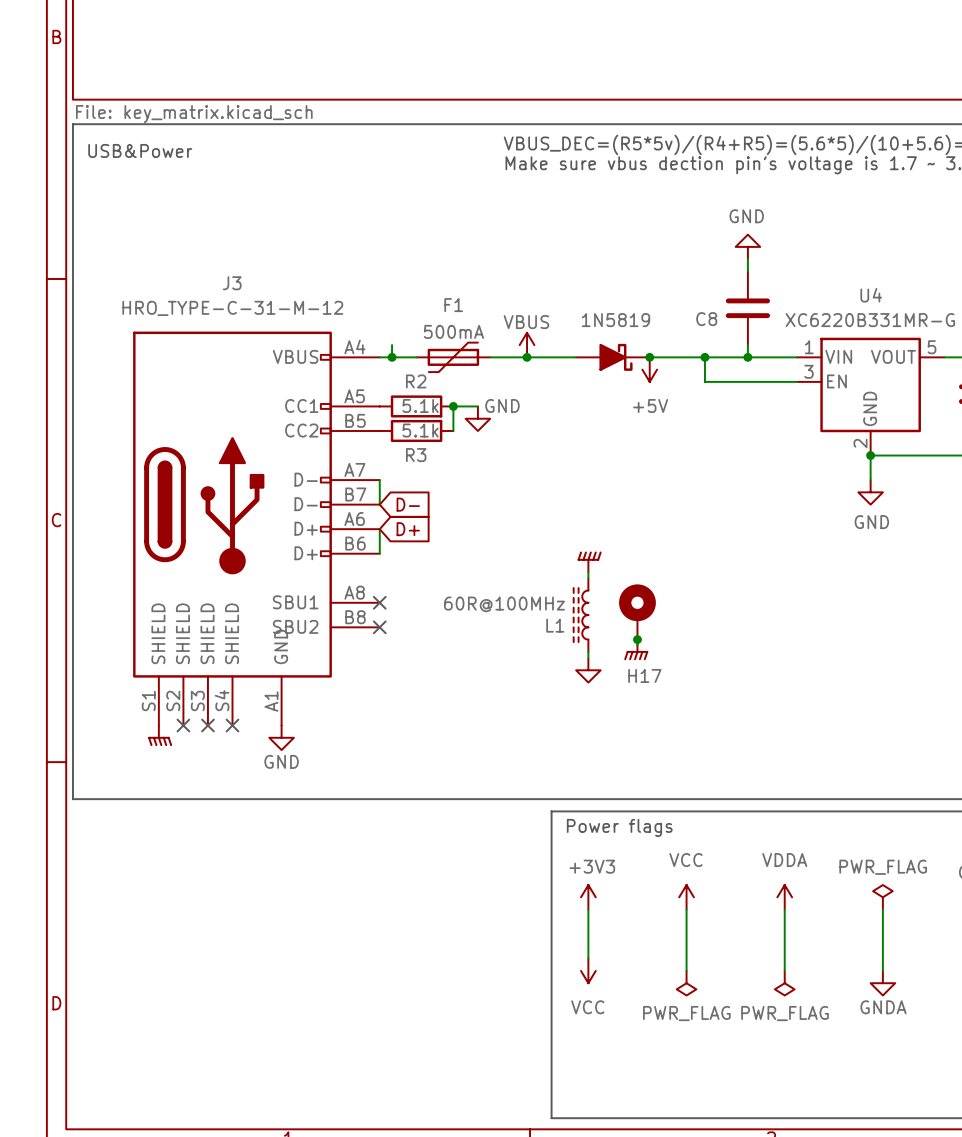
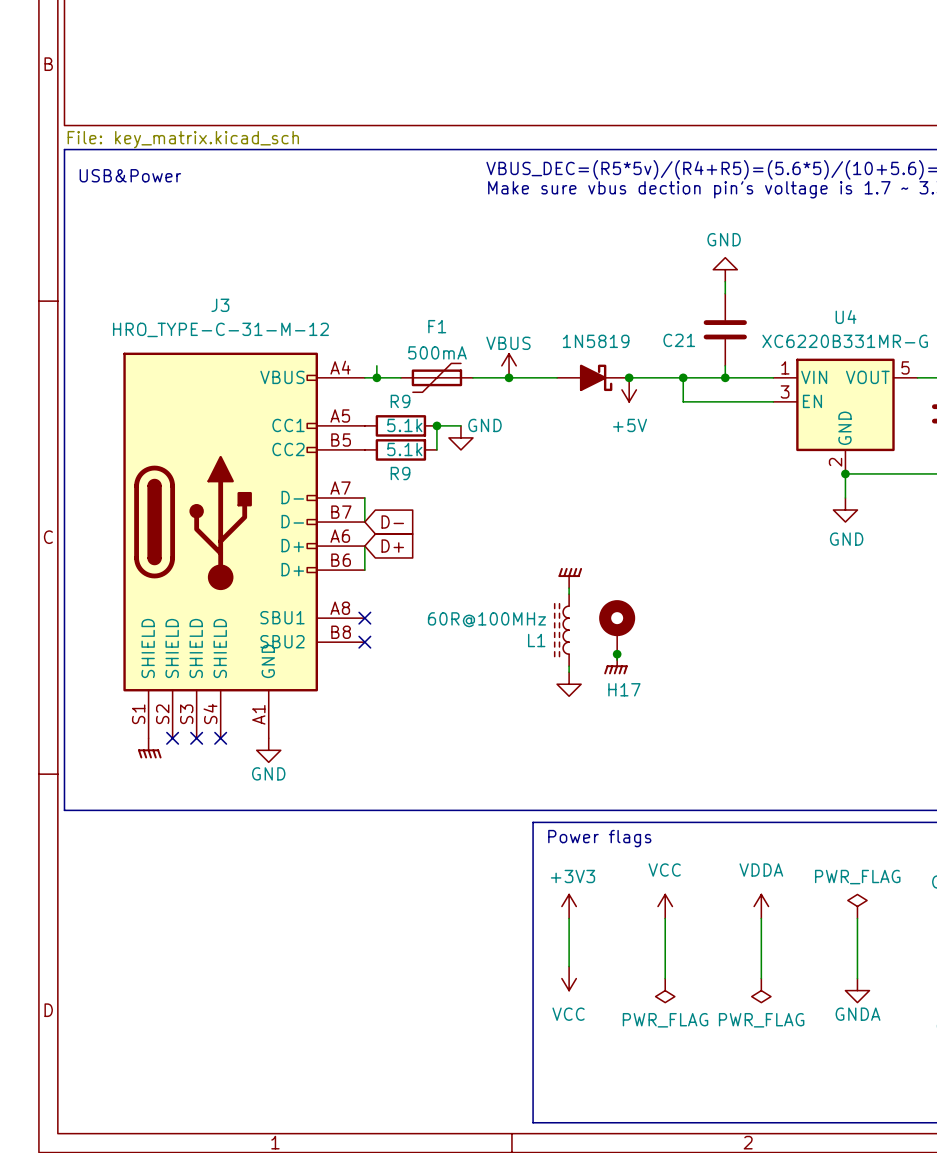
C8 name: C8 (706, 319) -> C21 (679, 340)
R2 name: R2 (416, 381) -> R9 (400, 401)
R3 name: R3 (416, 455) -> R9 (400, 473)

